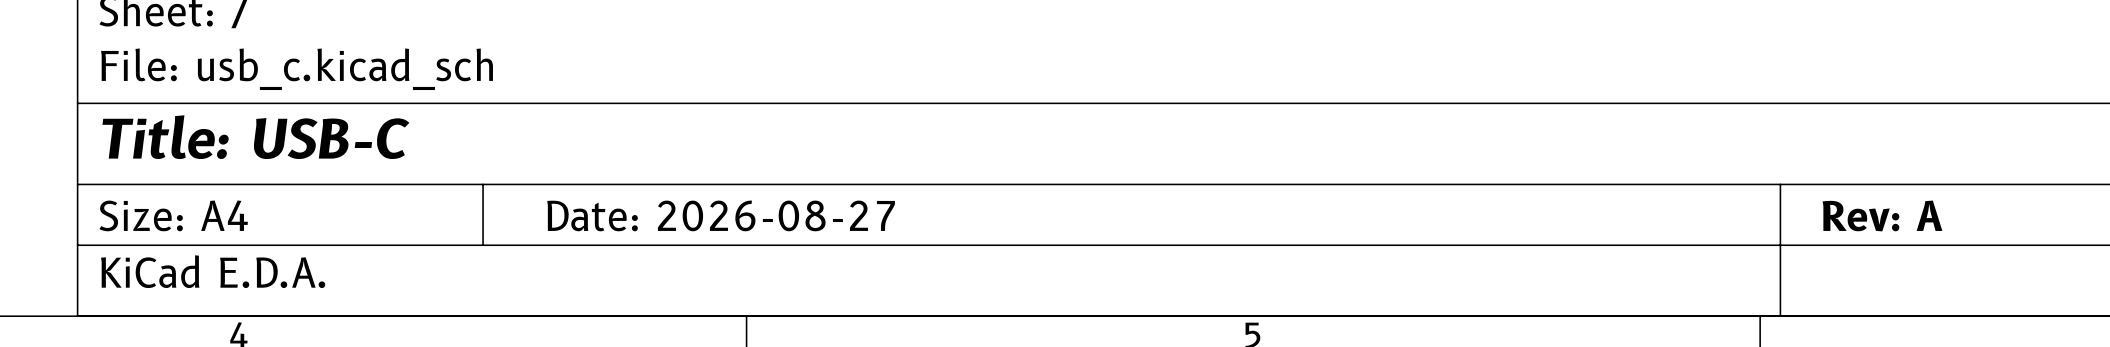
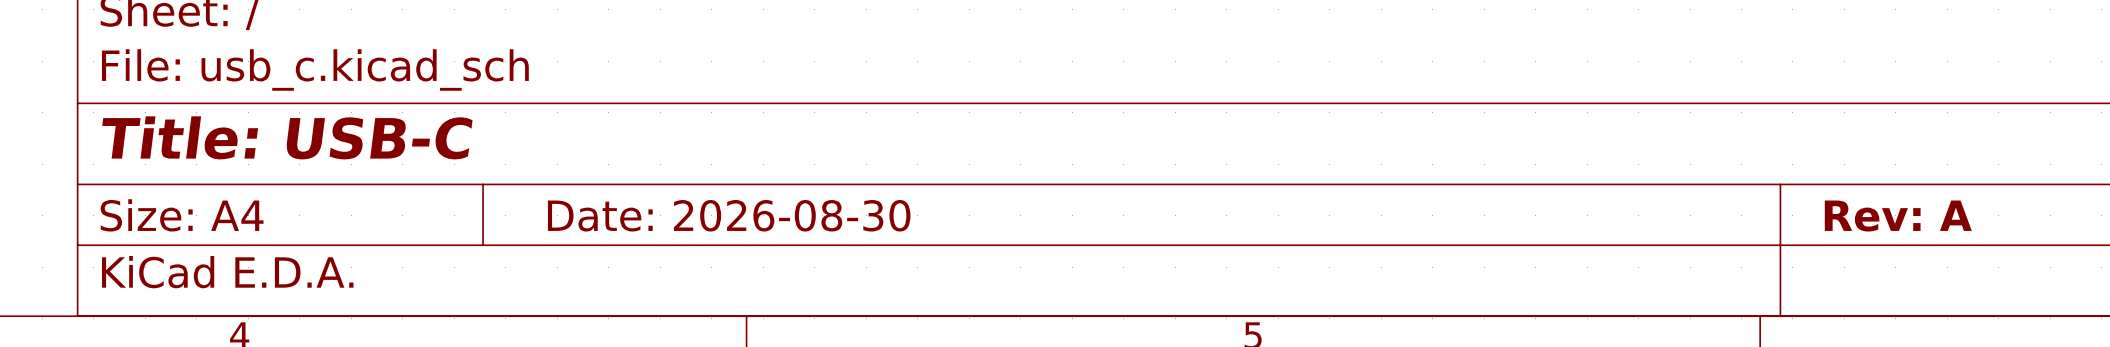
title block: Date: 2026-08-27 (721, 215) -> Date: 2026-08-30 (729, 215)

